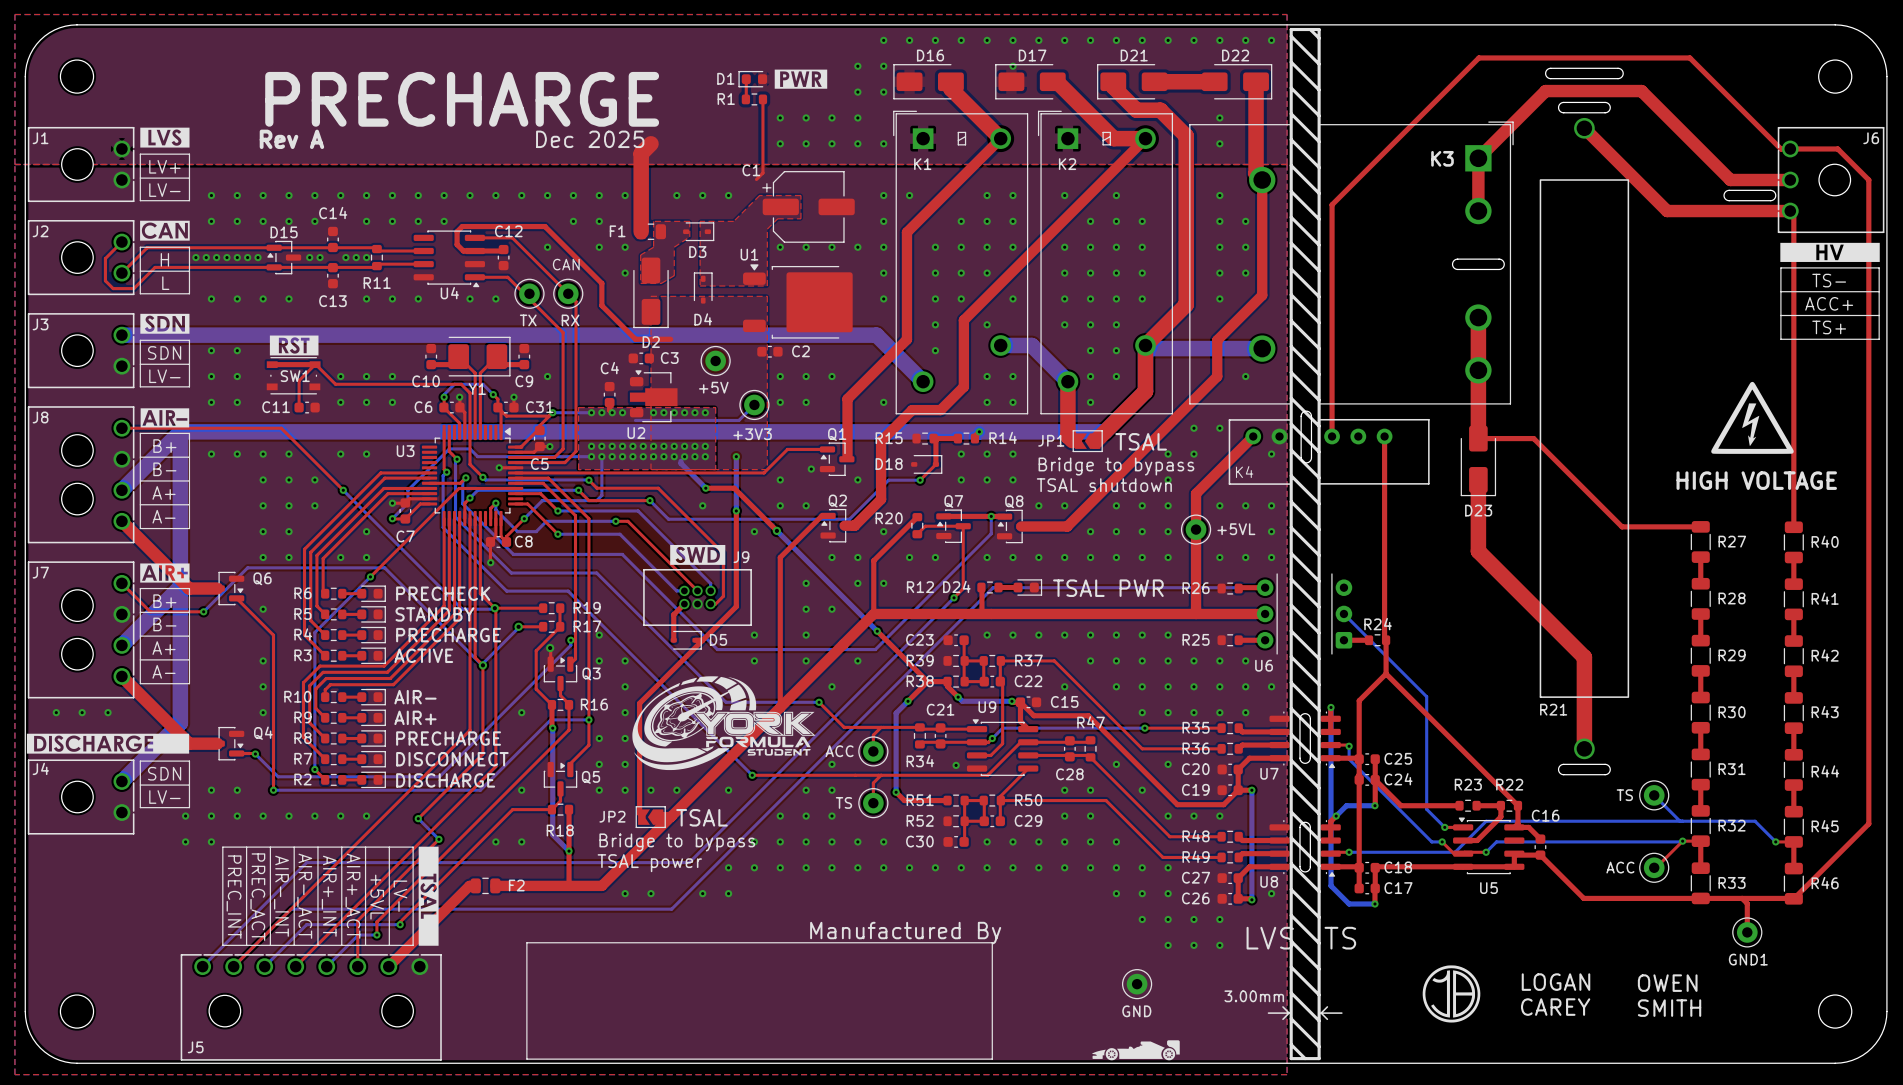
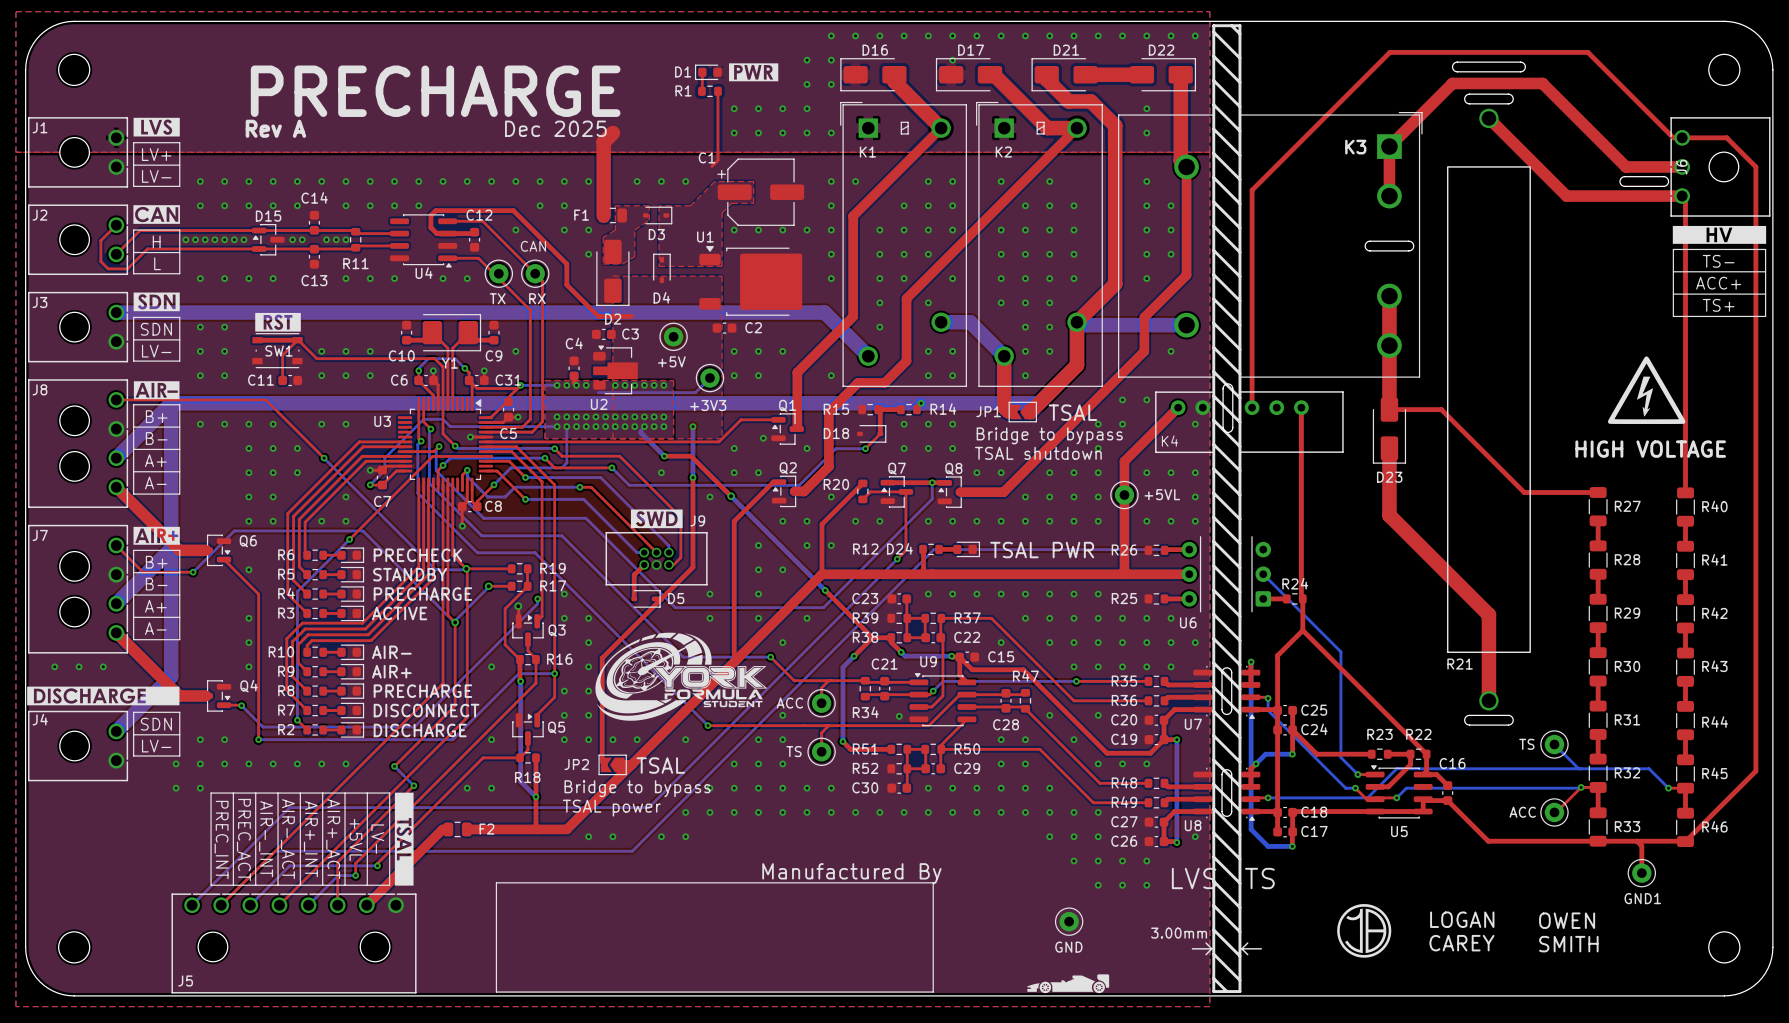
J6 name rotation: 0° (1871, 138) -> 90° counterclockwise (1681, 167)
J6 name position: J6 (1871, 138) -> J6 (1681, 167)

